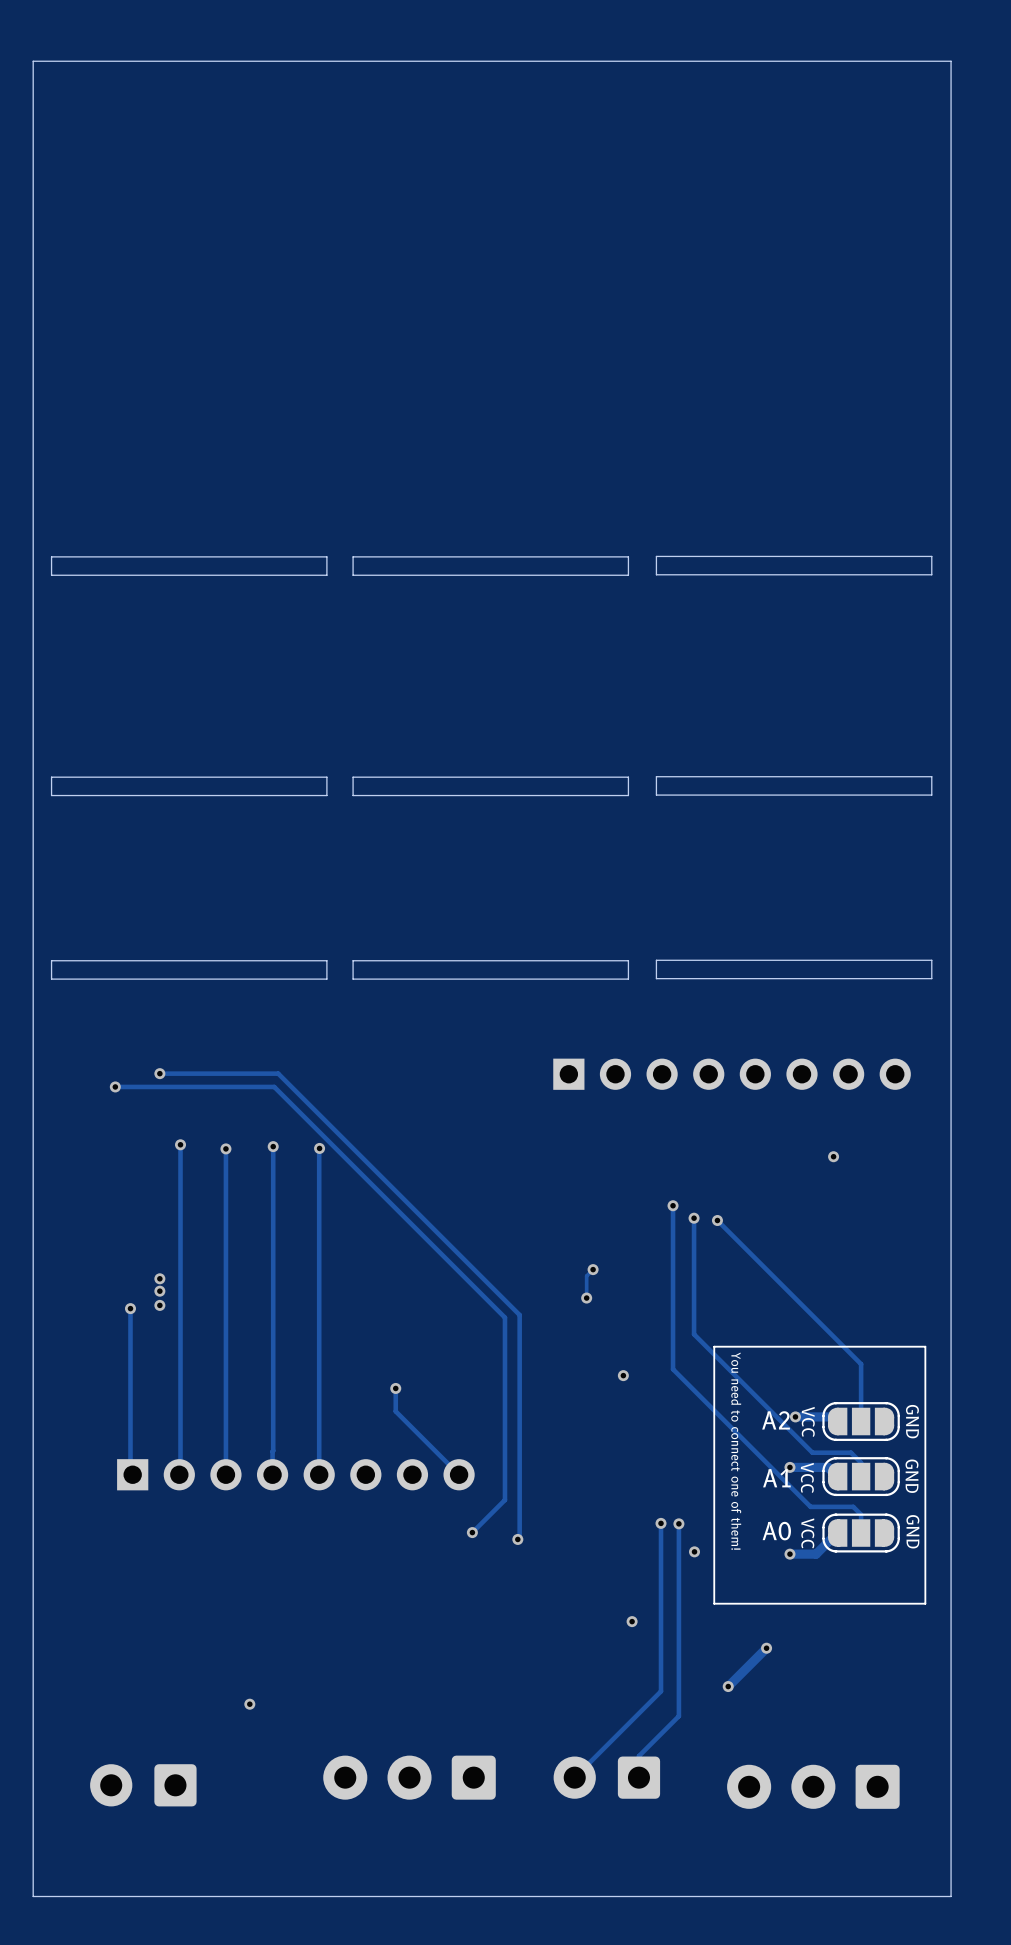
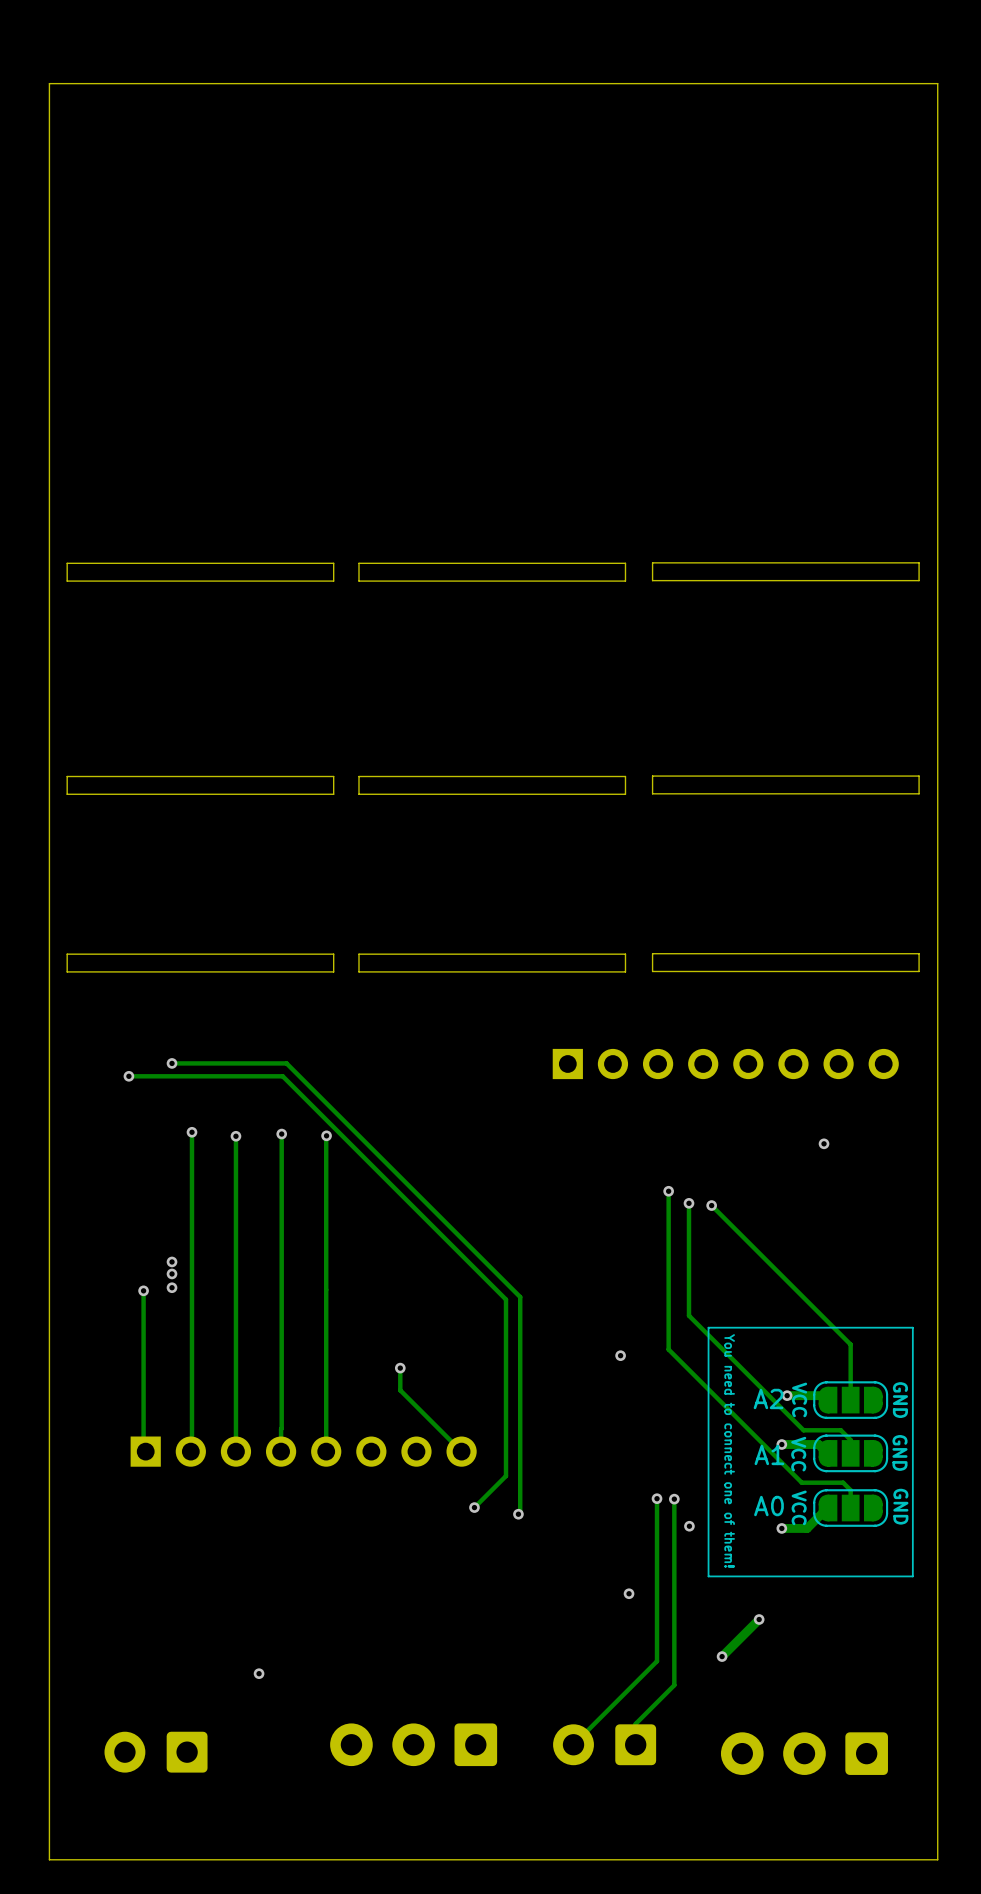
track: (593, 1269) (586, 1276) (586, 1298) -> none
via: (593, 1269) -> none
via: (586, 1298) -> none

